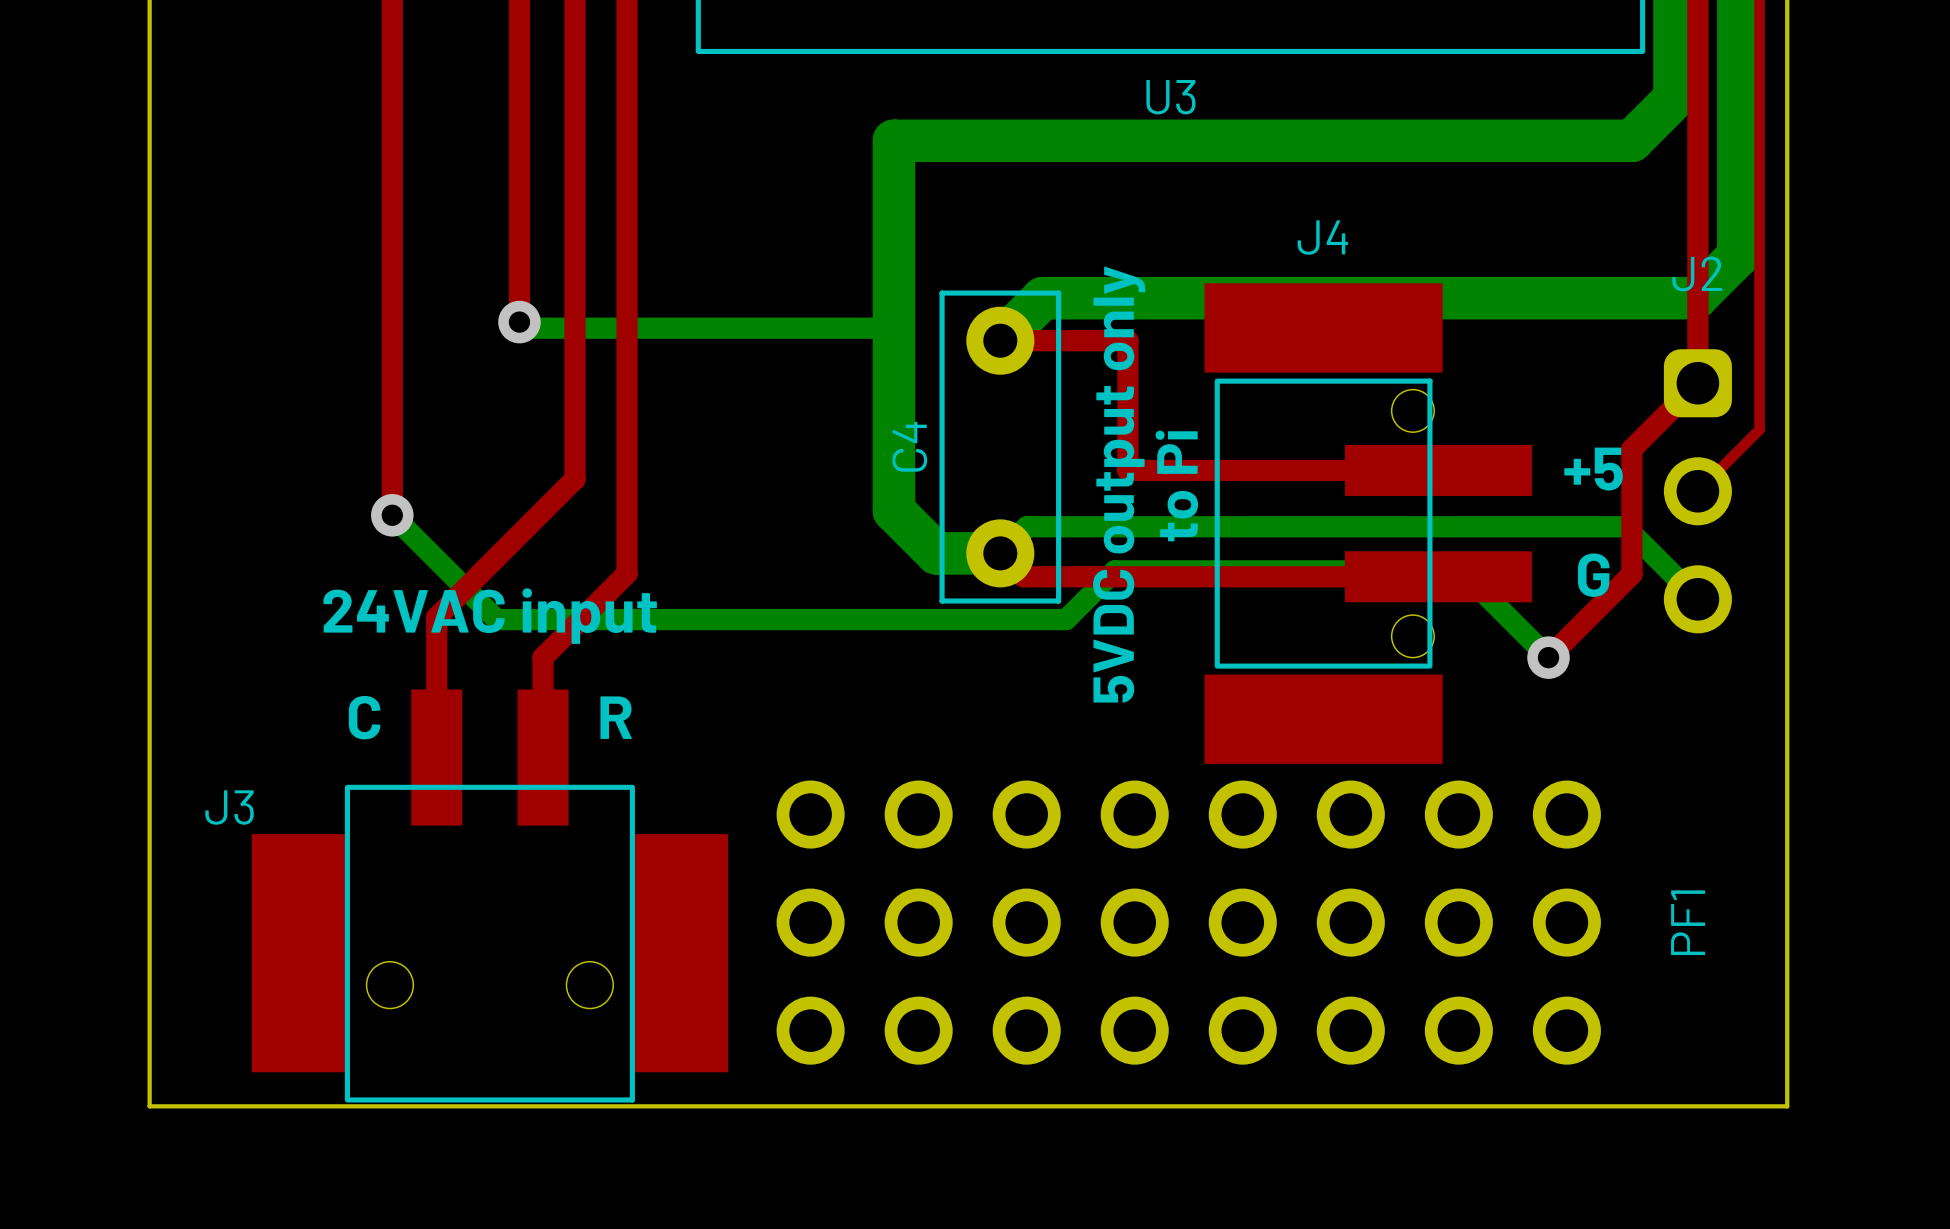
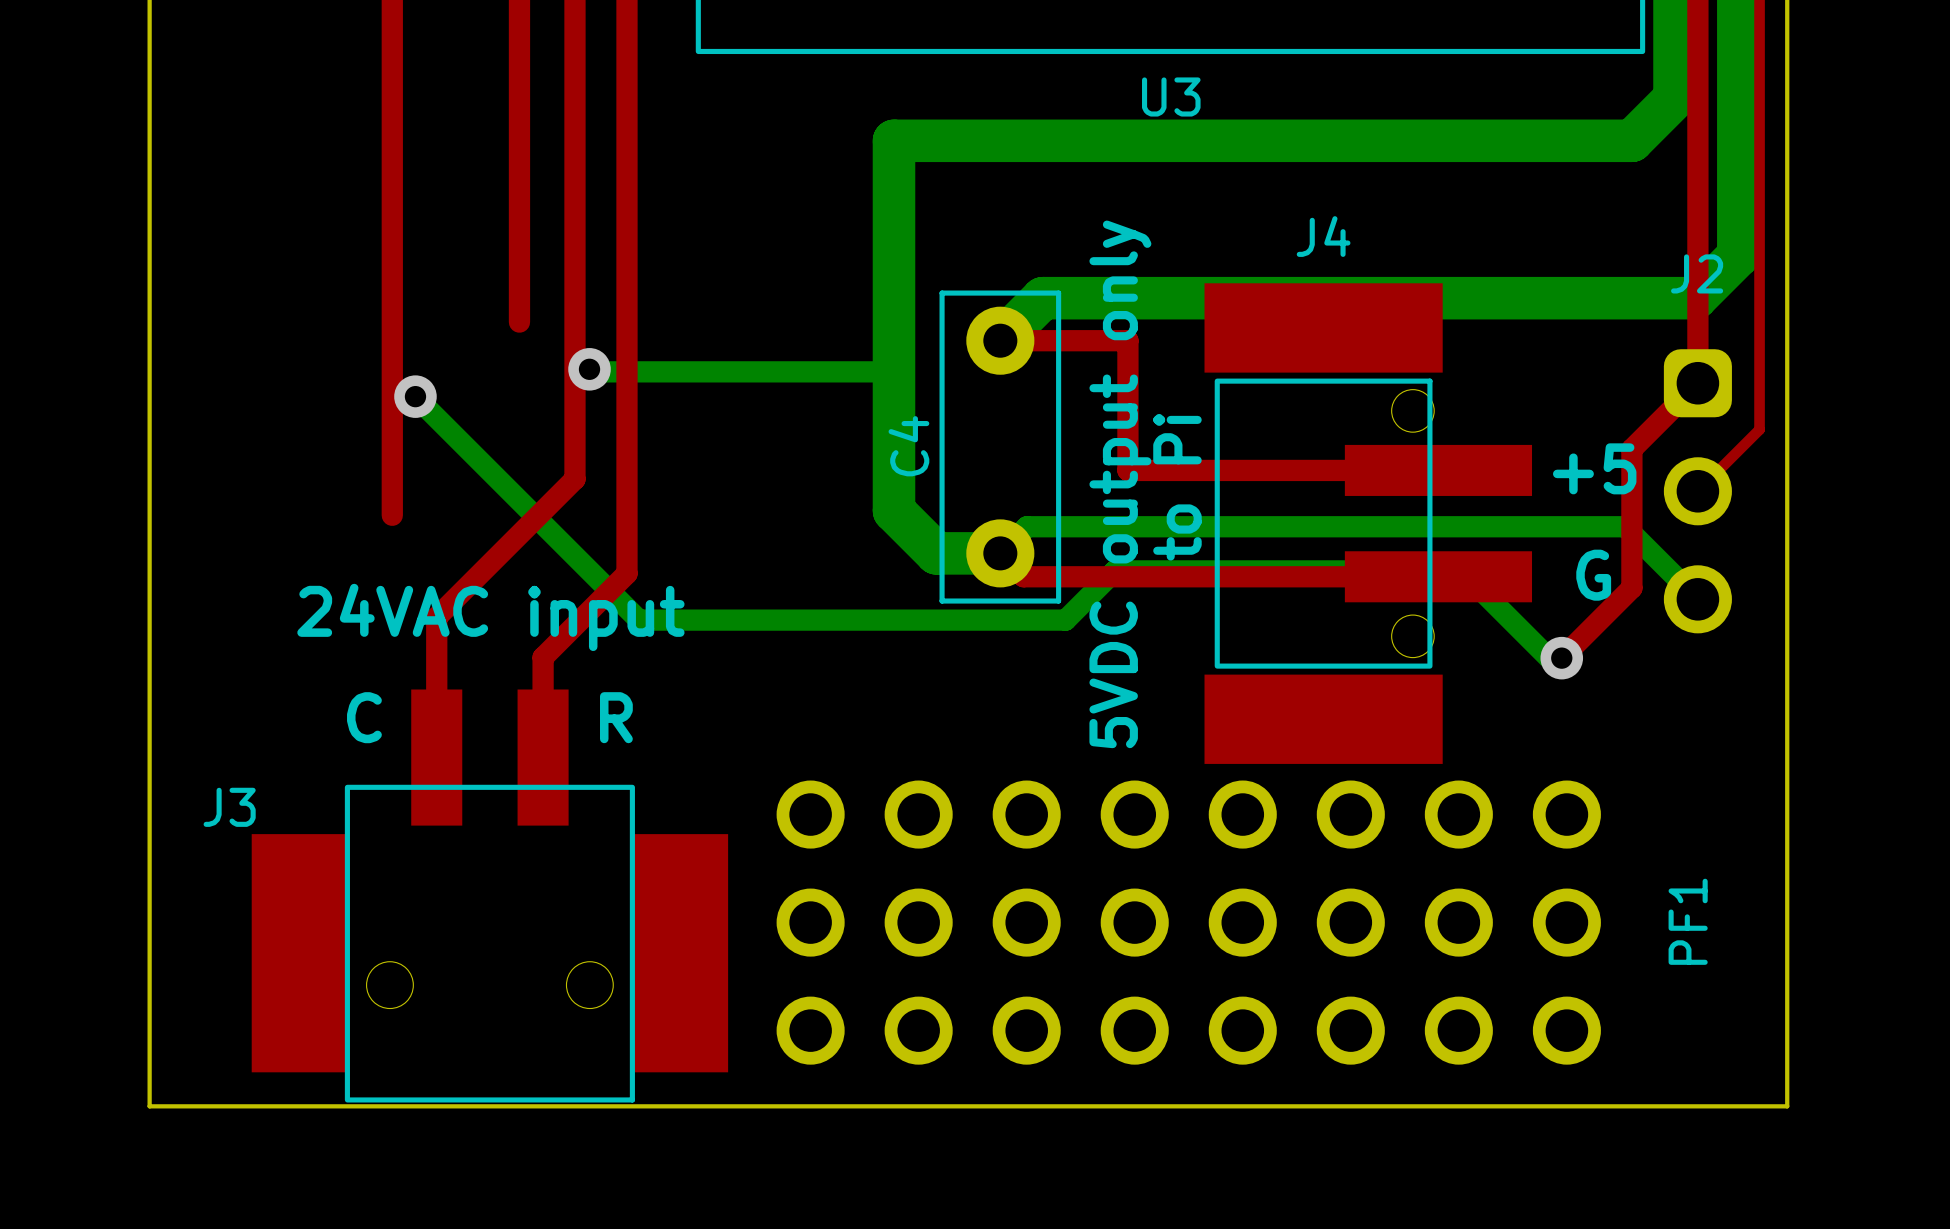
bottom track: (519, 322) (525, 328) (893, 328) -> none
via: (519, 322) -> none
bottom track: none -> (589, 369) (592, 371) (893, 371)
via: none -> (589, 369)
via: none -> (415, 396)
bottom track: (392, 515) (496, 619) (1066, 619) -> (415, 396) (638, 620) (1065, 620)
via: (392, 515) -> none
top track: (1631, 574) (1548, 657) -> (1631, 574) (1631, 588) (1561, 658)
via position: (1548, 657) -> (1561, 658)

